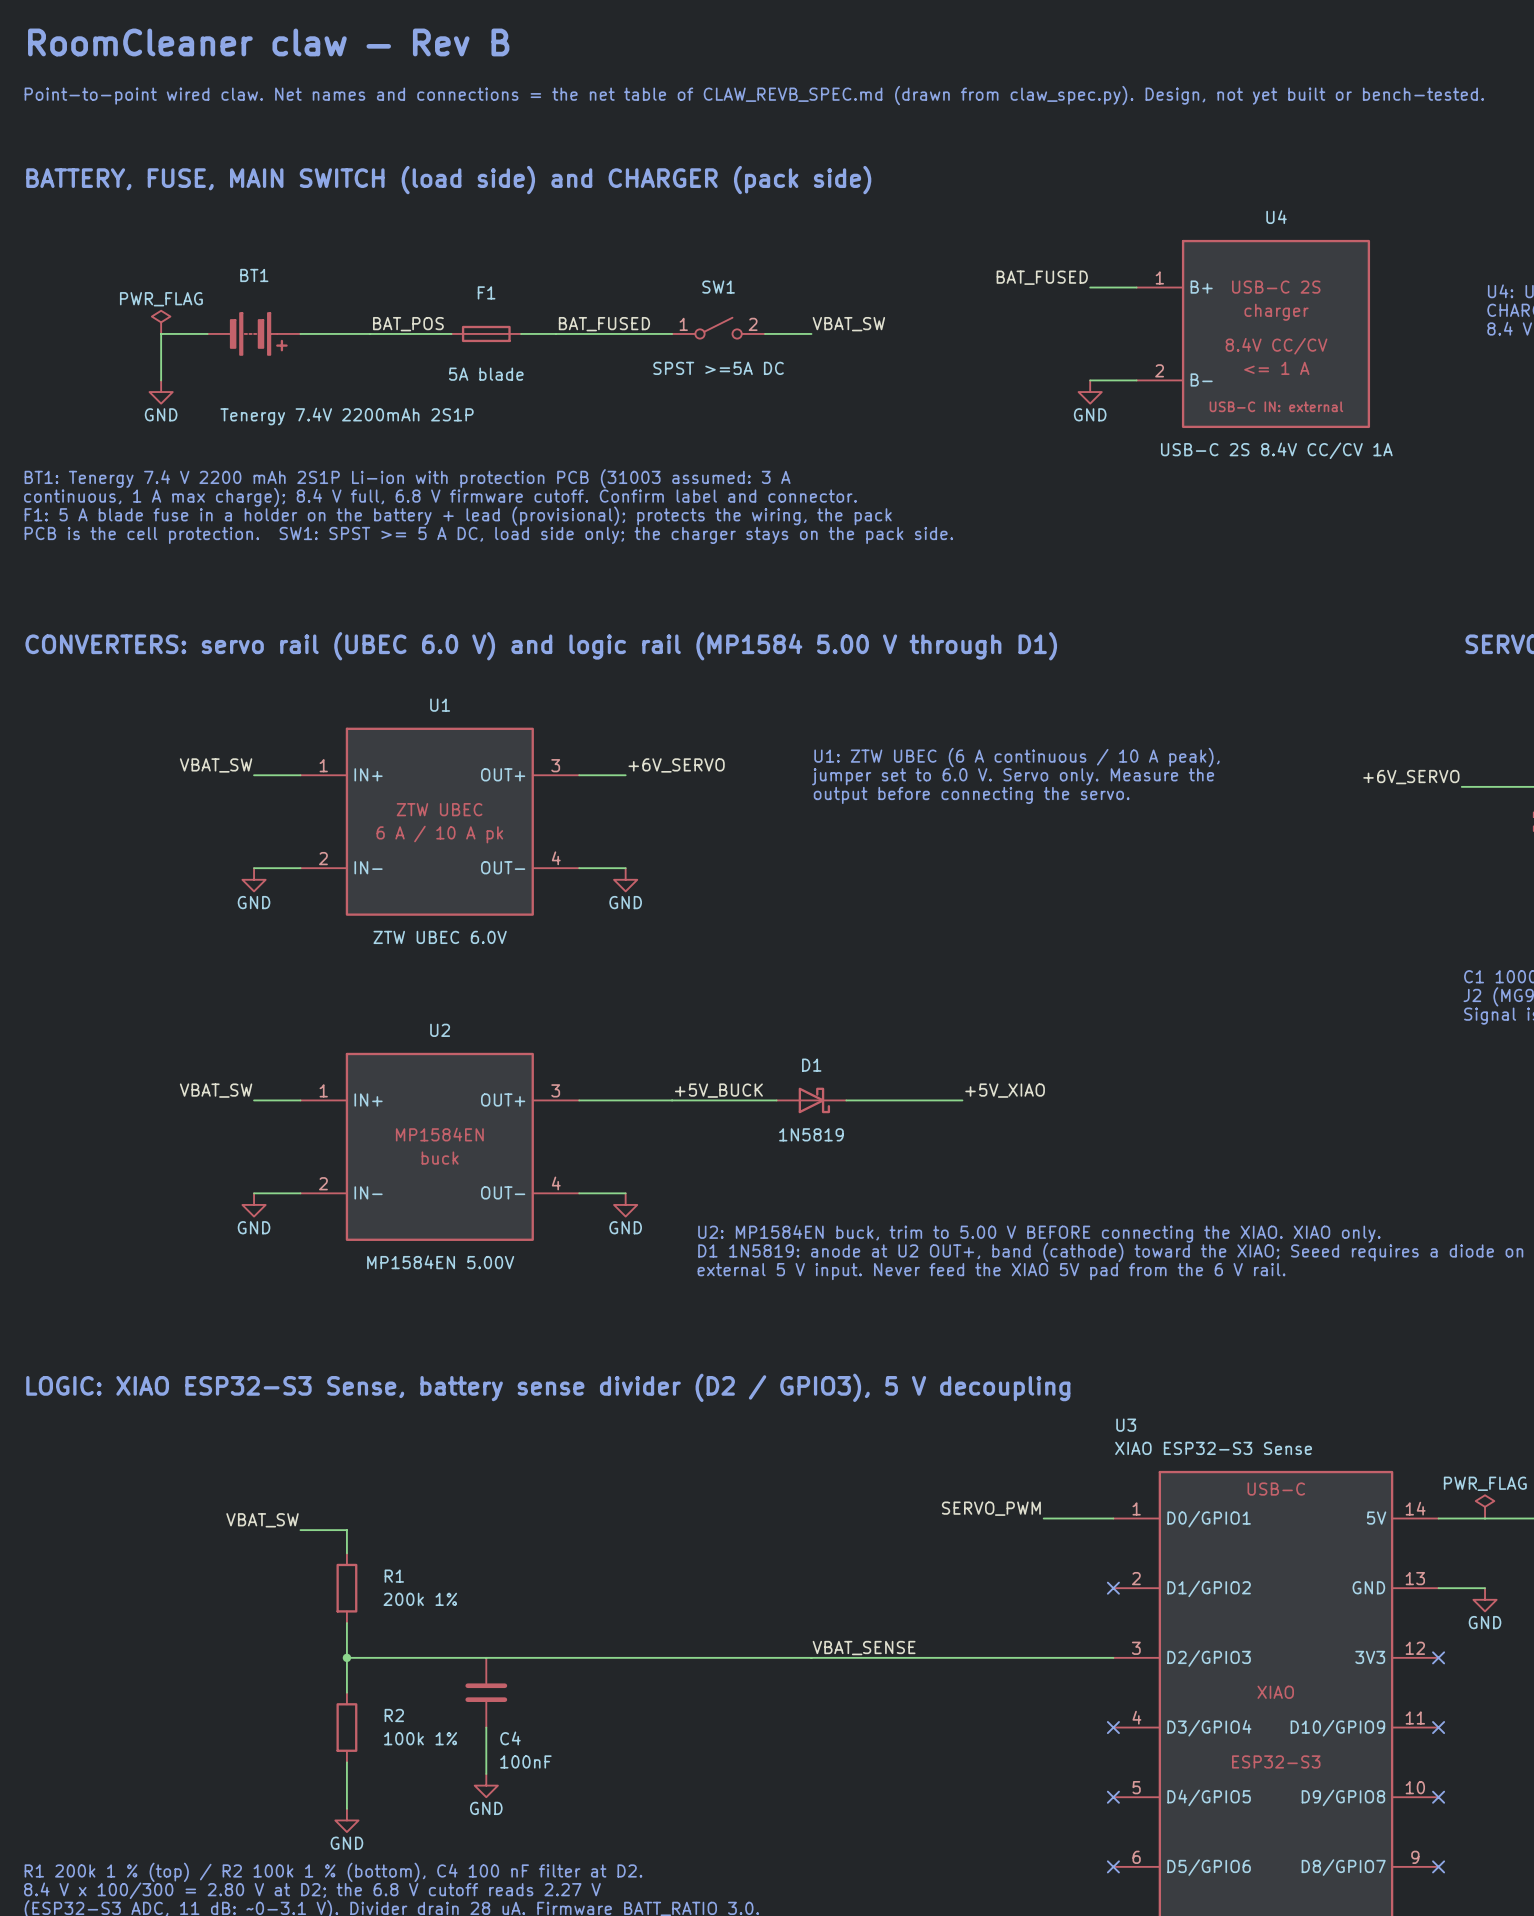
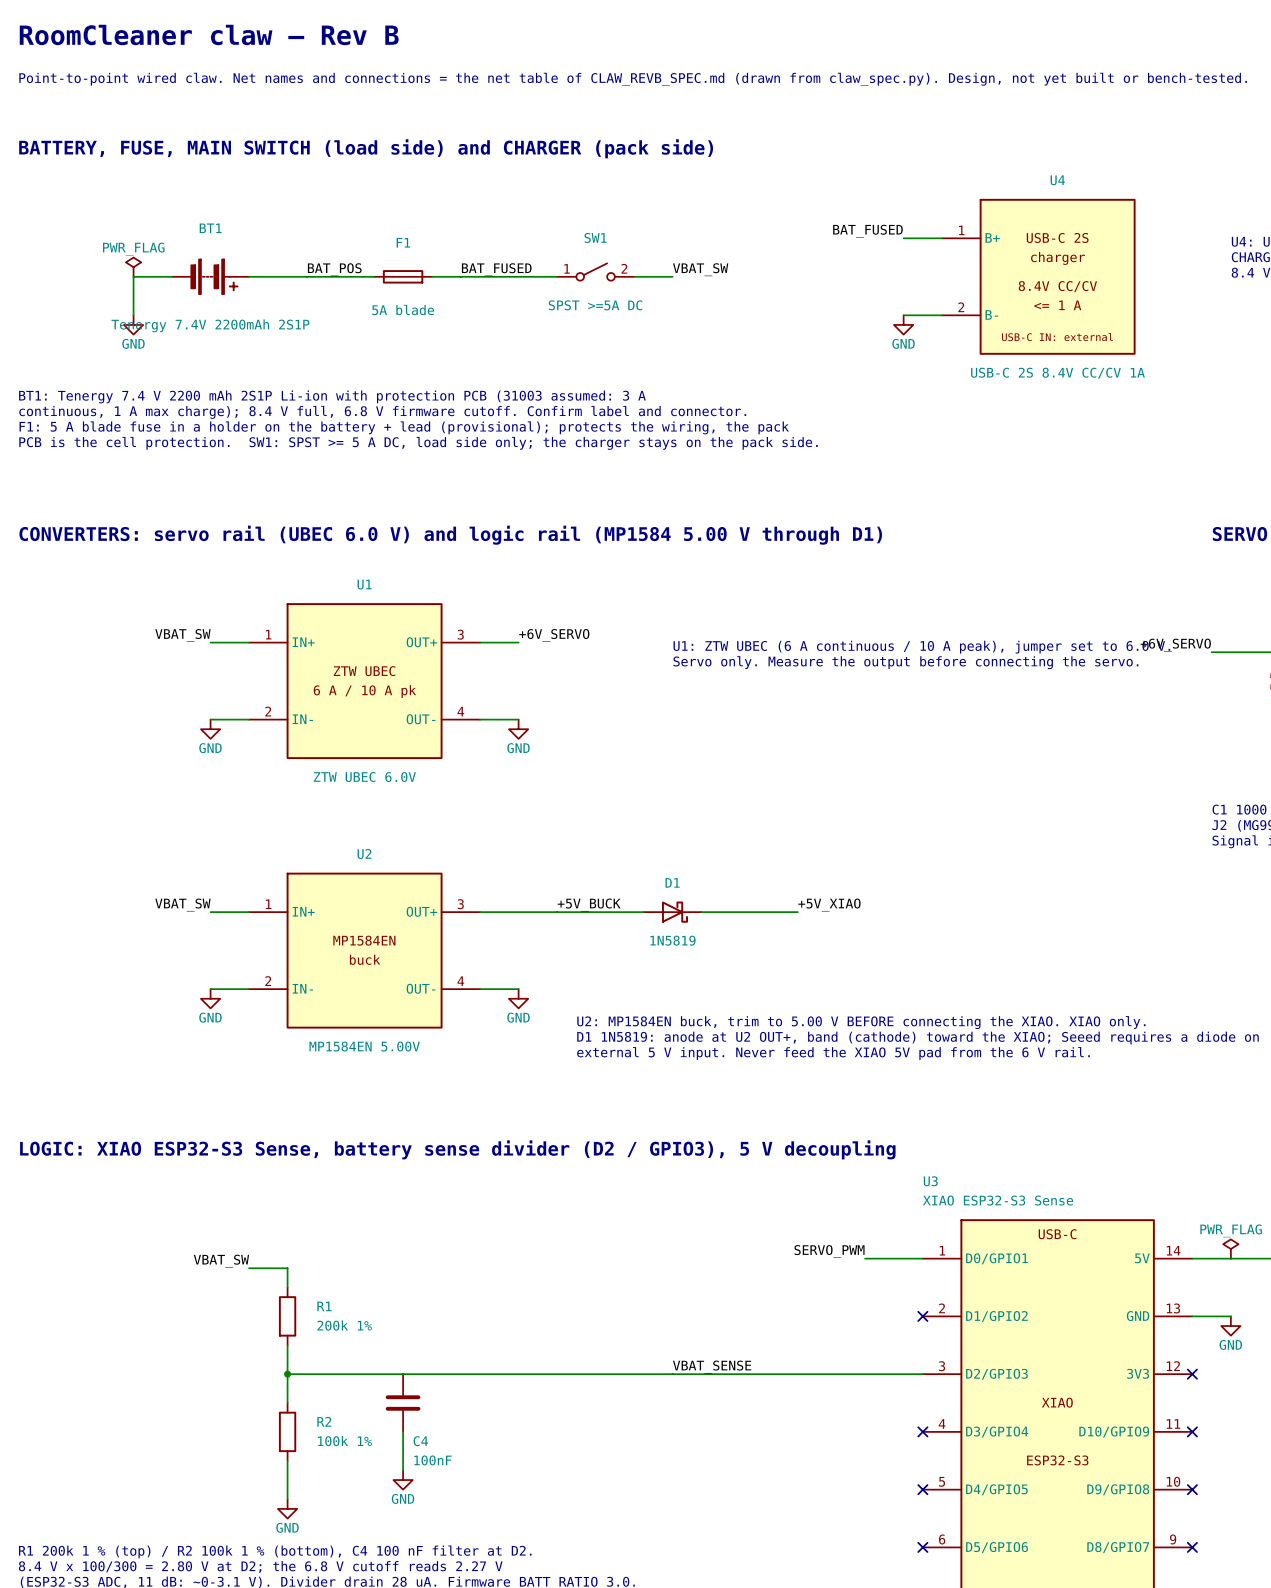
BT1 value position: Tenergy 7.4V 2200mAh 2S1P (347, 416) -> Tenergy 7.4V 2200mAh 2S1P (210, 325)
text: U1: ZTW UBEC (6 A continuous / 10 A peak), (1016, 757) -> none
text: jumper set to 6.0 V. Servo only. Measure the (1013, 776) -> U1: ZTW UBEC (6 A continuous / 10 A peak), jumper set to 6.0 V. (921, 647)
text: output before connecting the servo. (971, 795) -> Servo only. Measure the output before connecting the servo. (905, 662)

